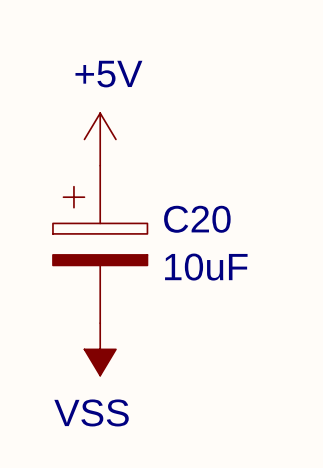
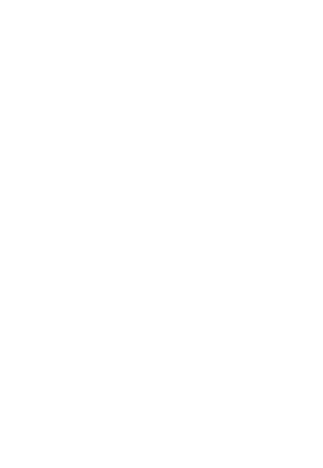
power symbol: +5V (100, 139) -> none
C20: 10uF (100, 244) -> none
power symbol: VSS (100, 349) -> none

